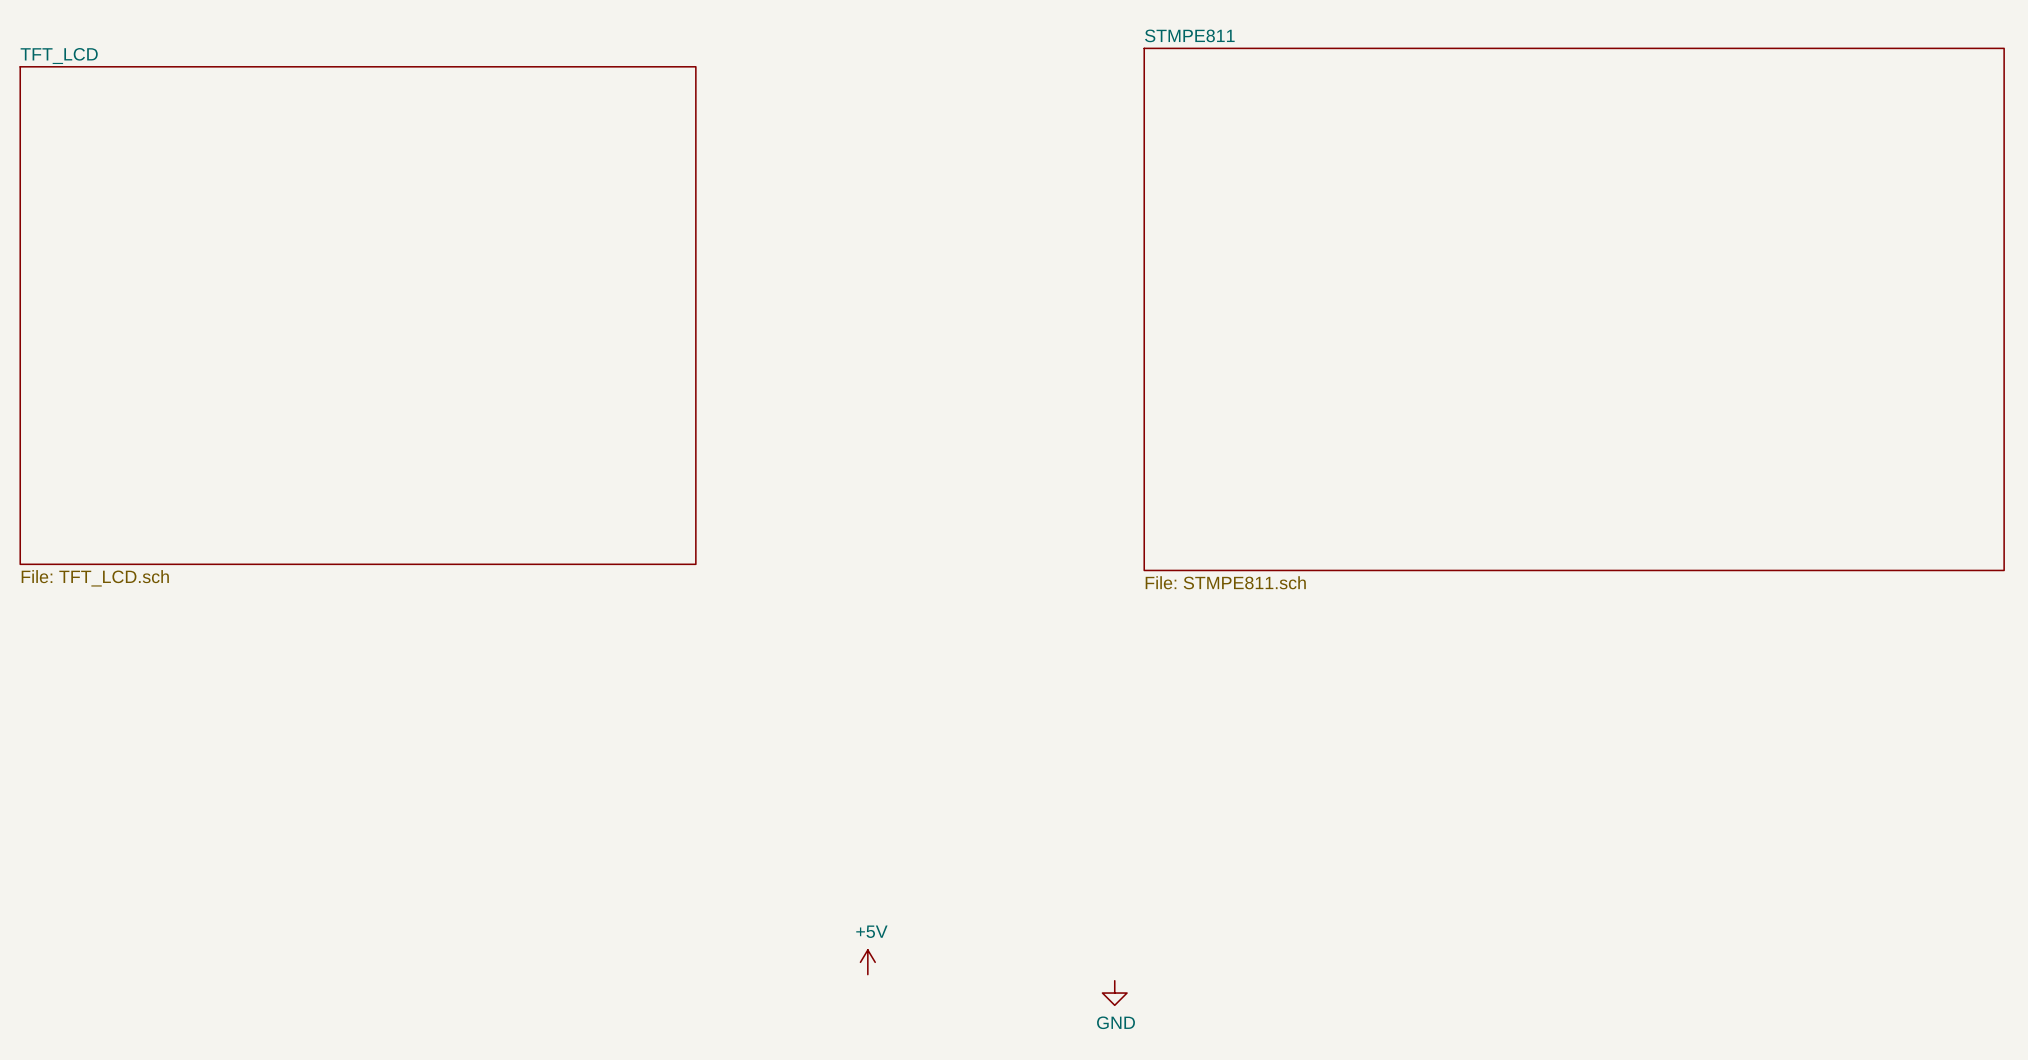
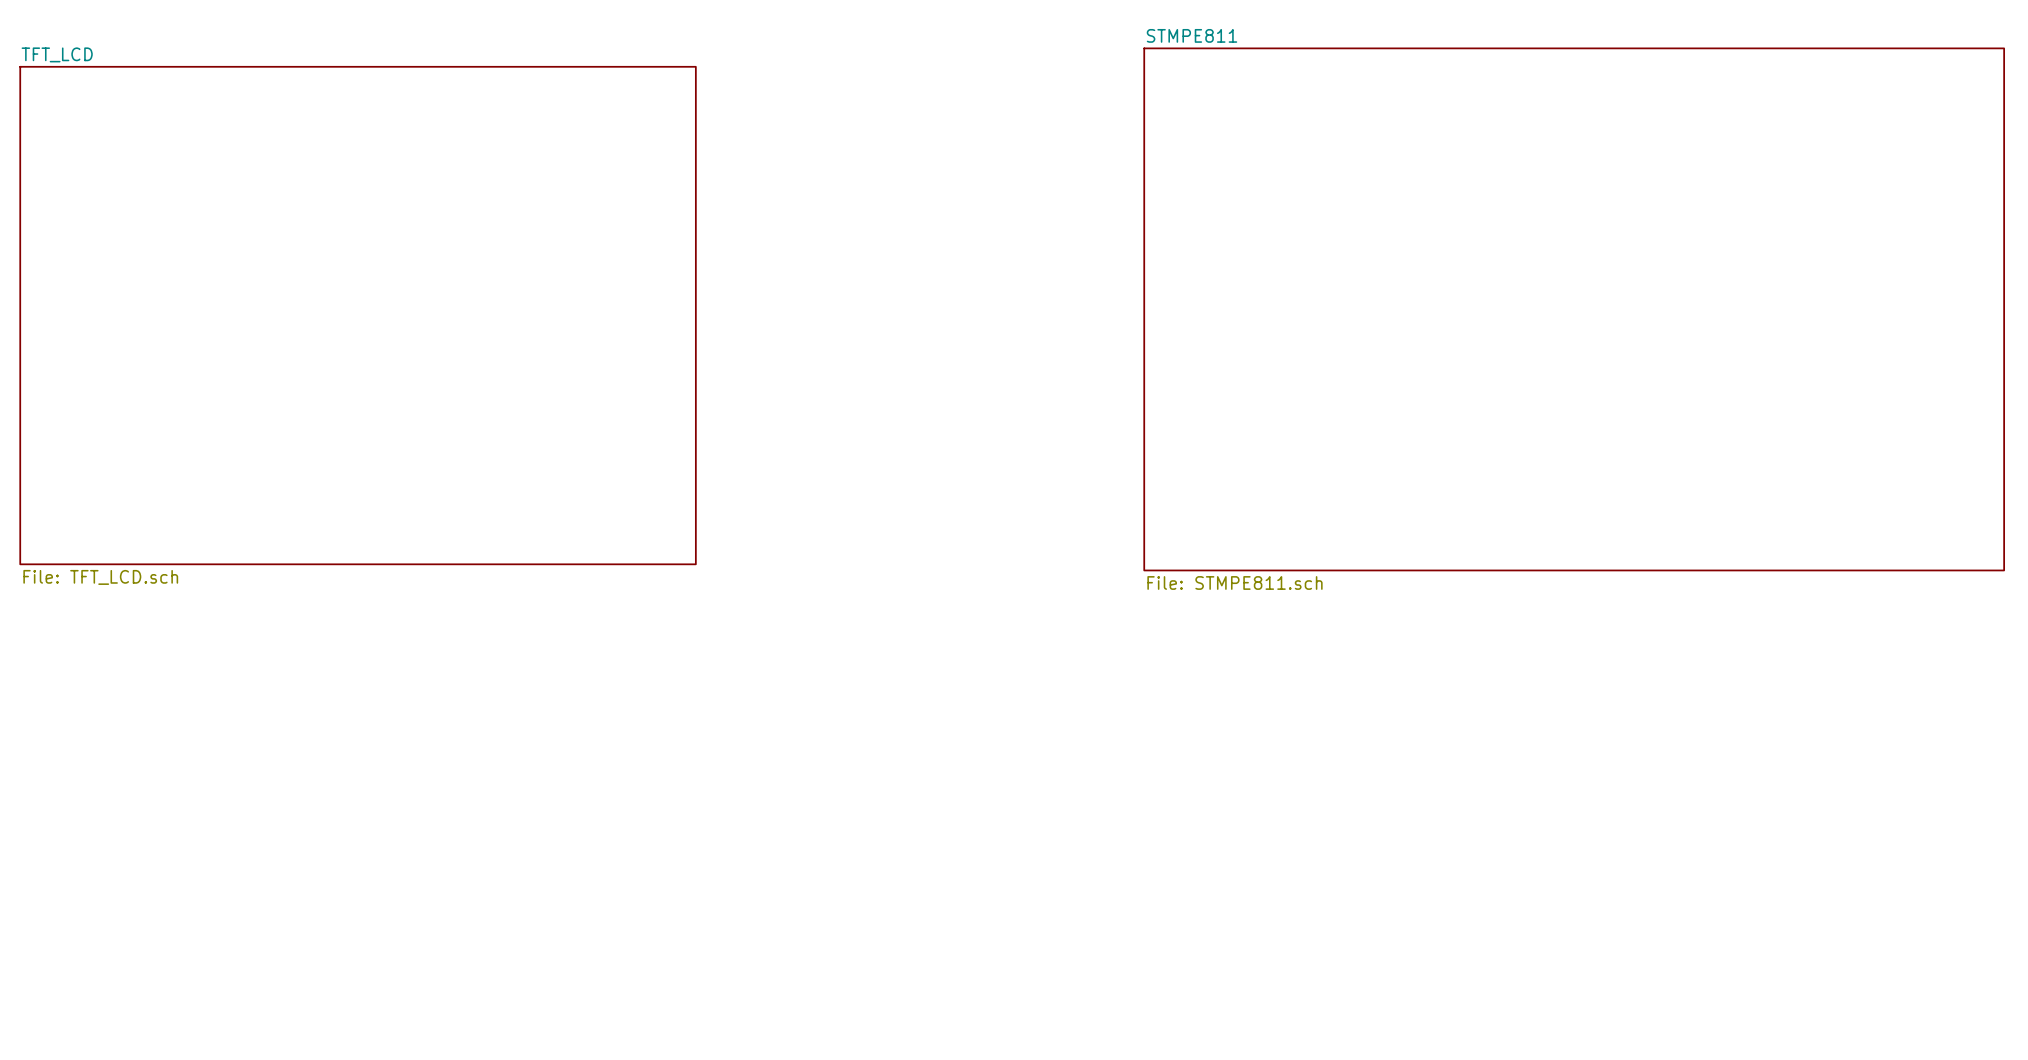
power symbol: +5V (867, 962) -> none
power symbol: GND (1114, 993) -> none

